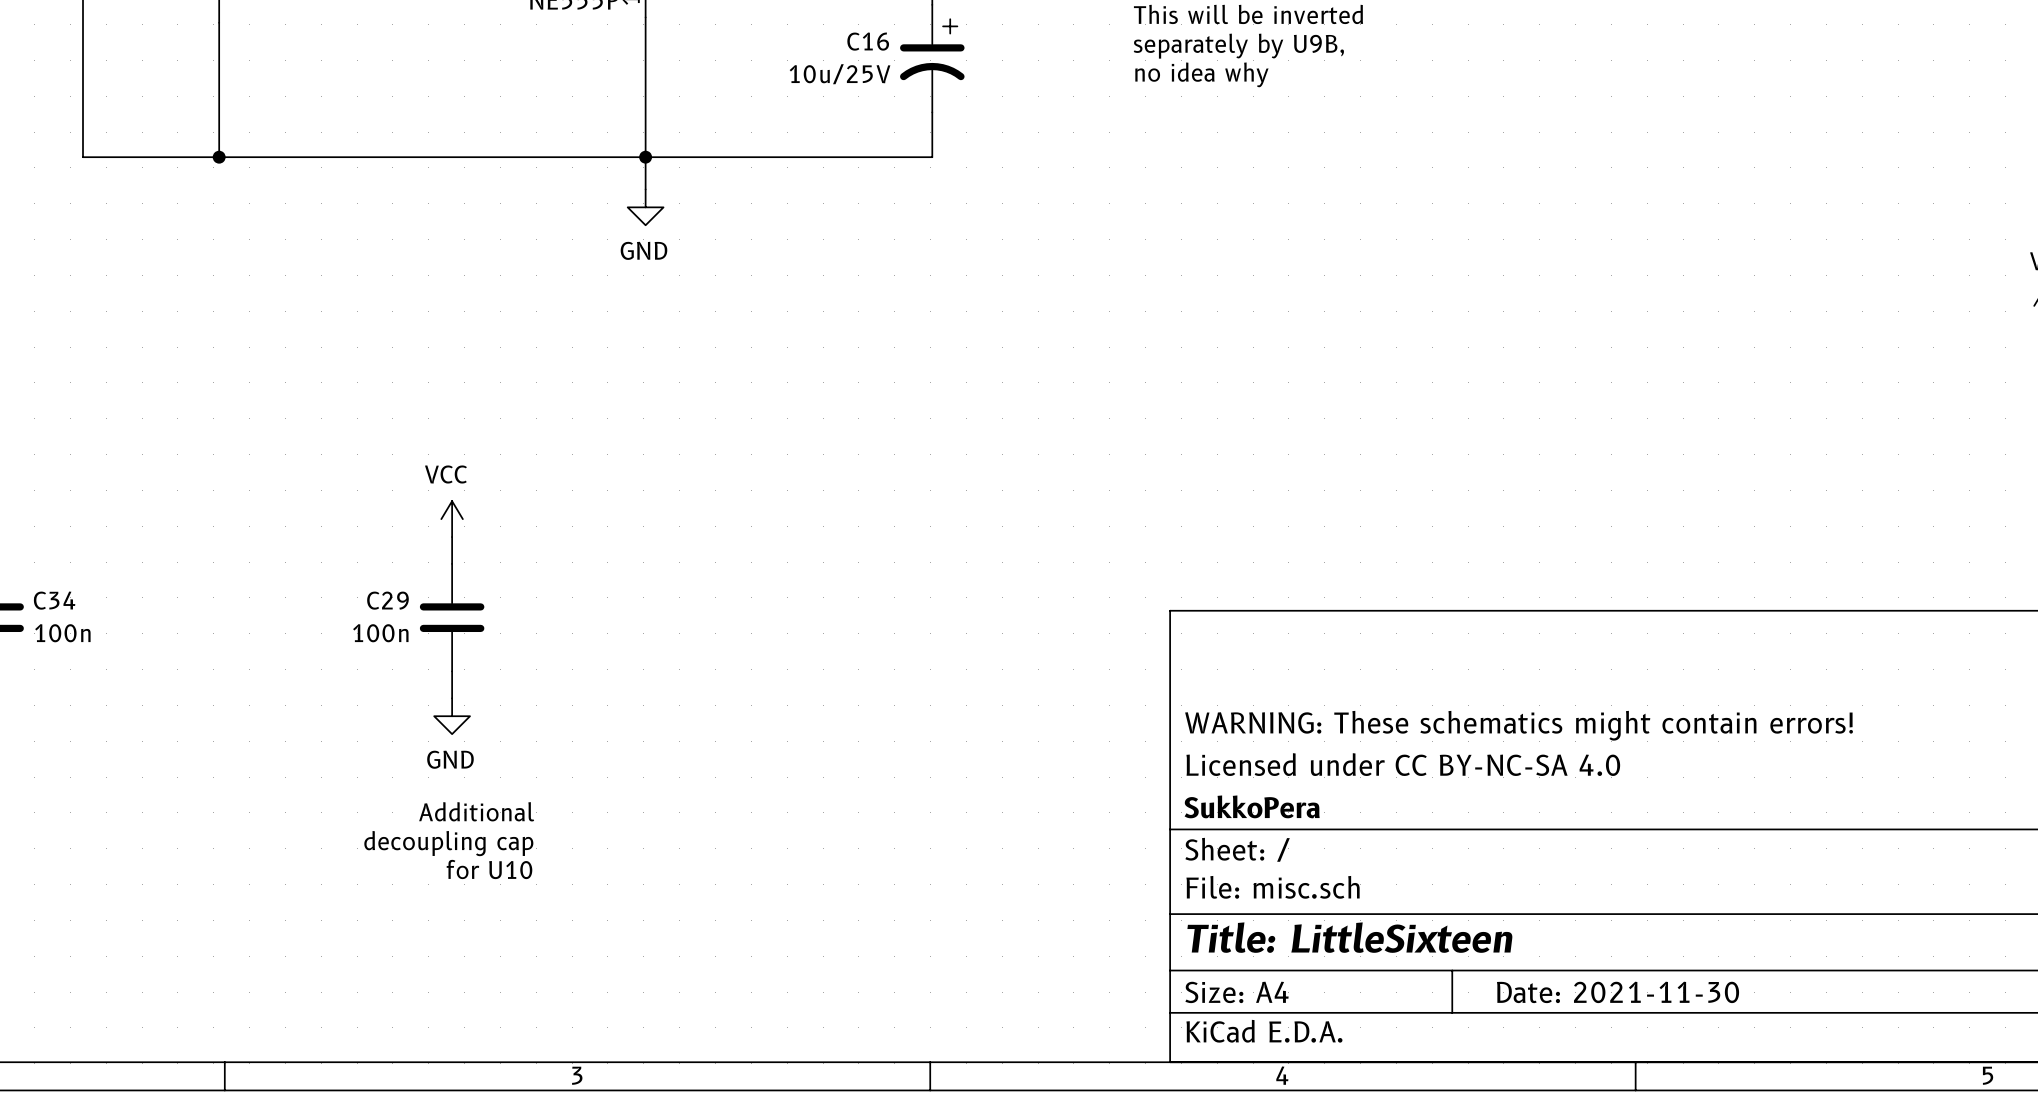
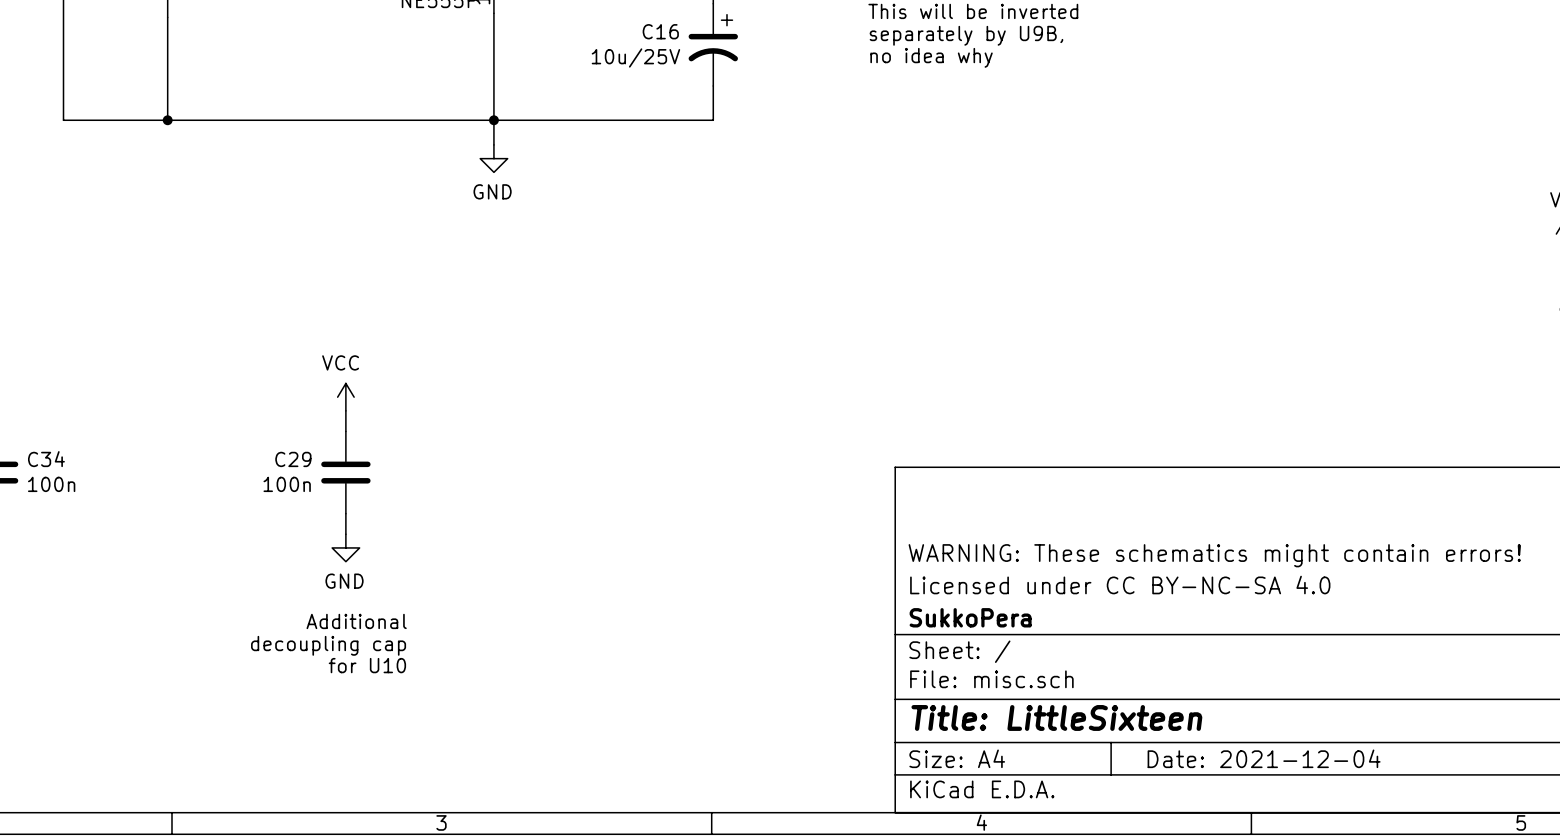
title block: Date: 2021-11-30 (1618, 992) -> Date: 2021-12-04 (1264, 758)

